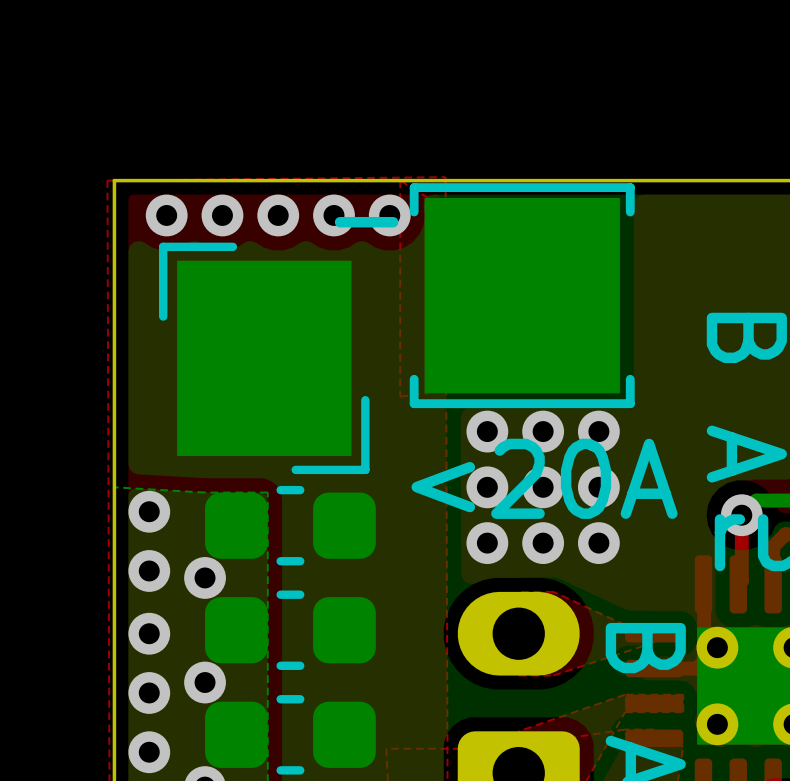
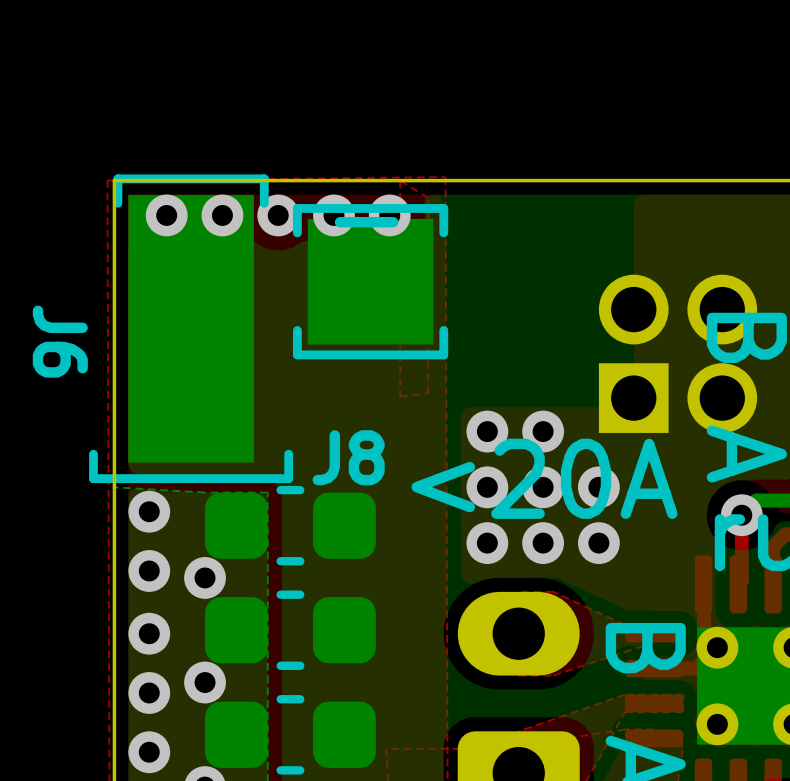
J8: none -> (370, 281)
part: (522, 295) -> none
J6: none -> (191, 328)
part: none -> (678, 353)
part: (264, 358) -> none
via: (598, 431) -> none

